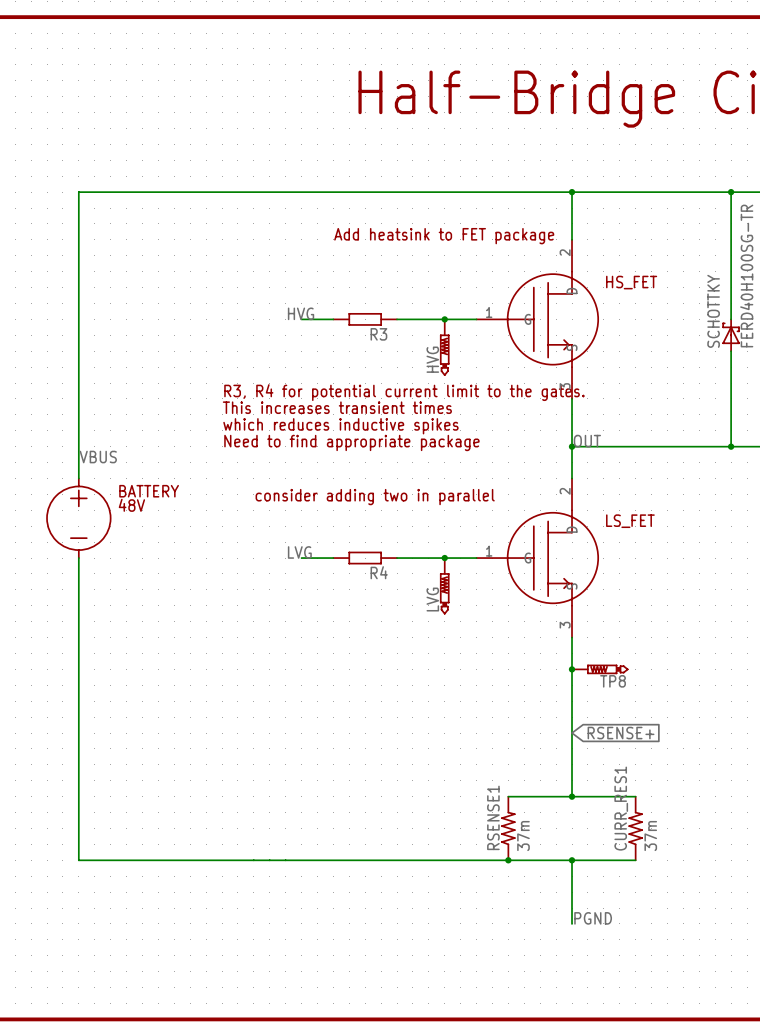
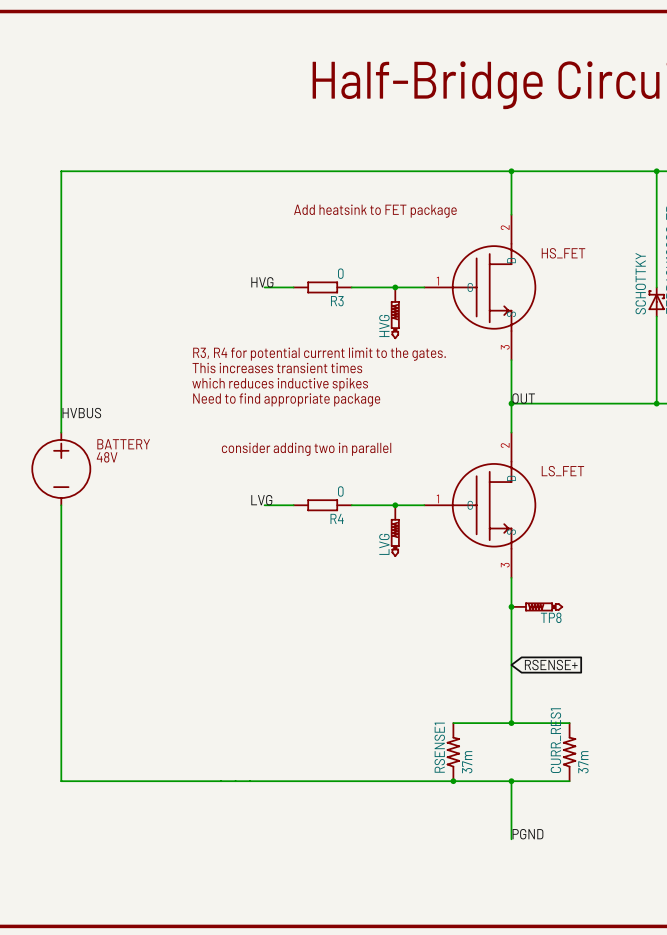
R3 value: none -> 0 (340, 273)
label: VBUS (98, 457) -> HVBUS (81, 413)
R4 value: none -> 0 (340, 491)

